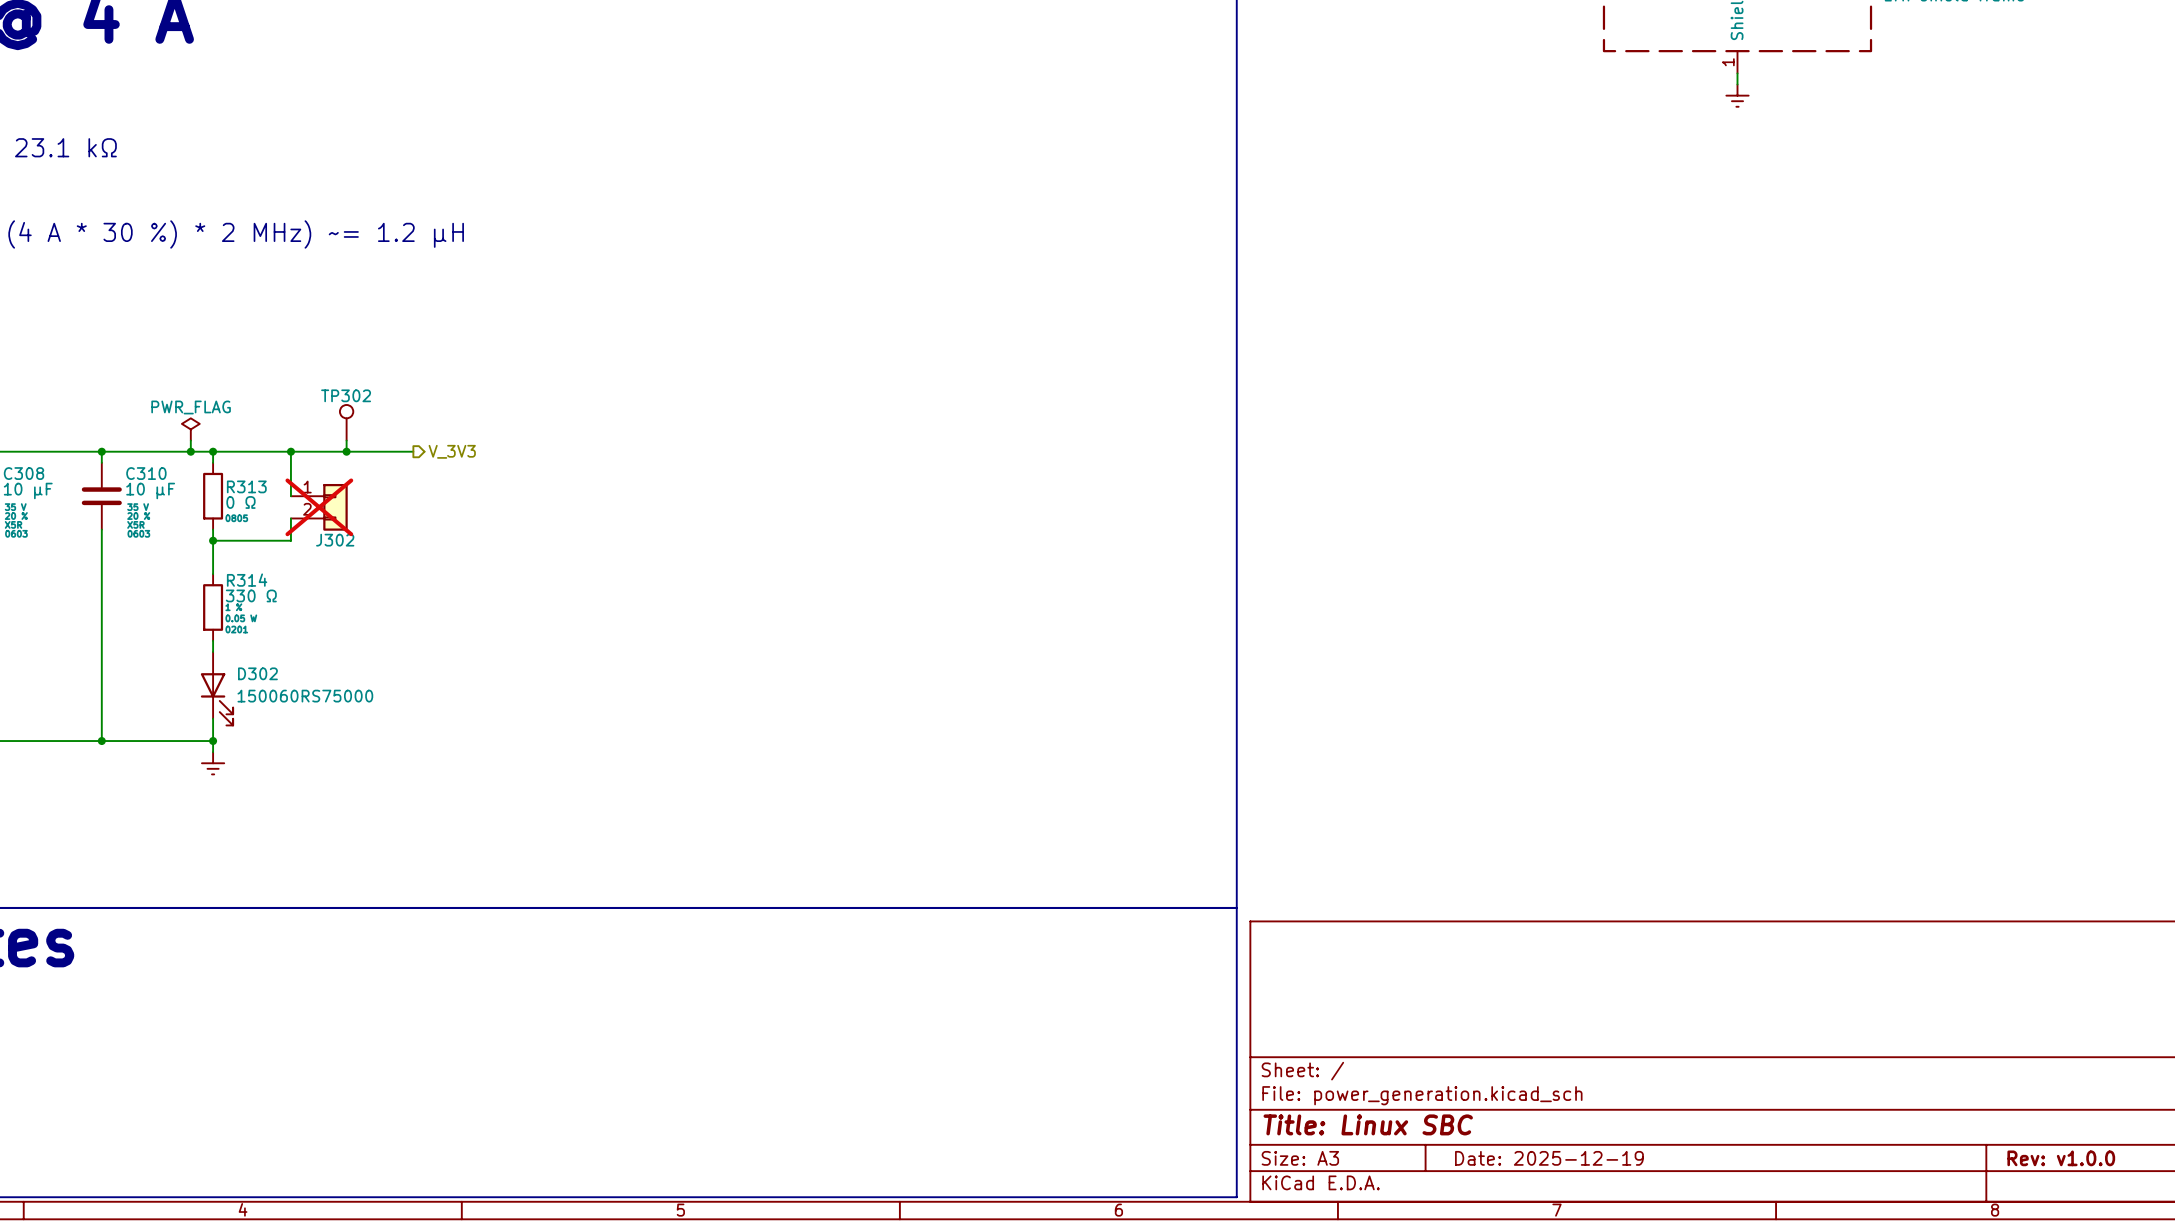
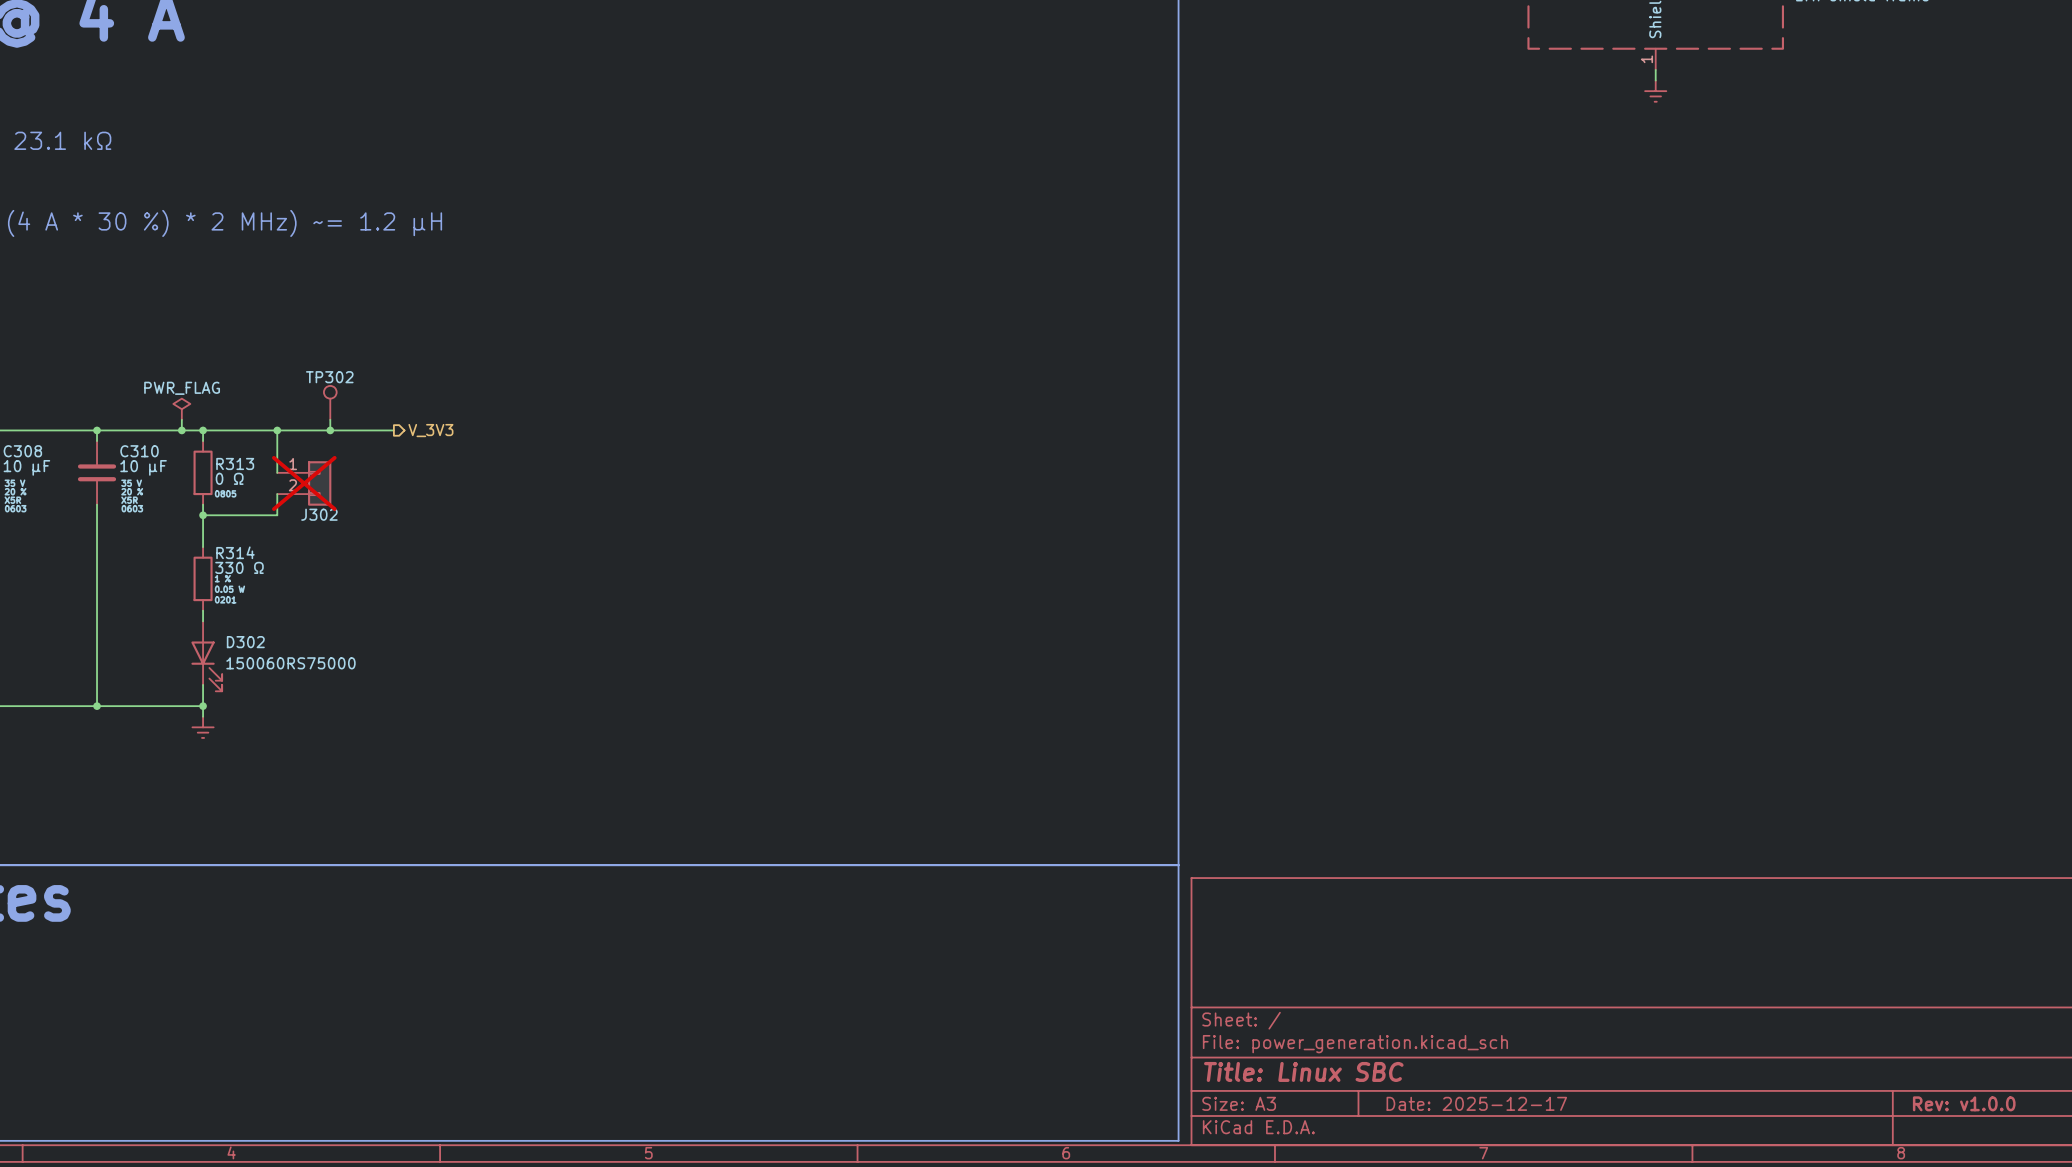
title block: Date: 2025-12-19 (1549, 1158) -> Date: 2025-12-17 (1476, 1103)

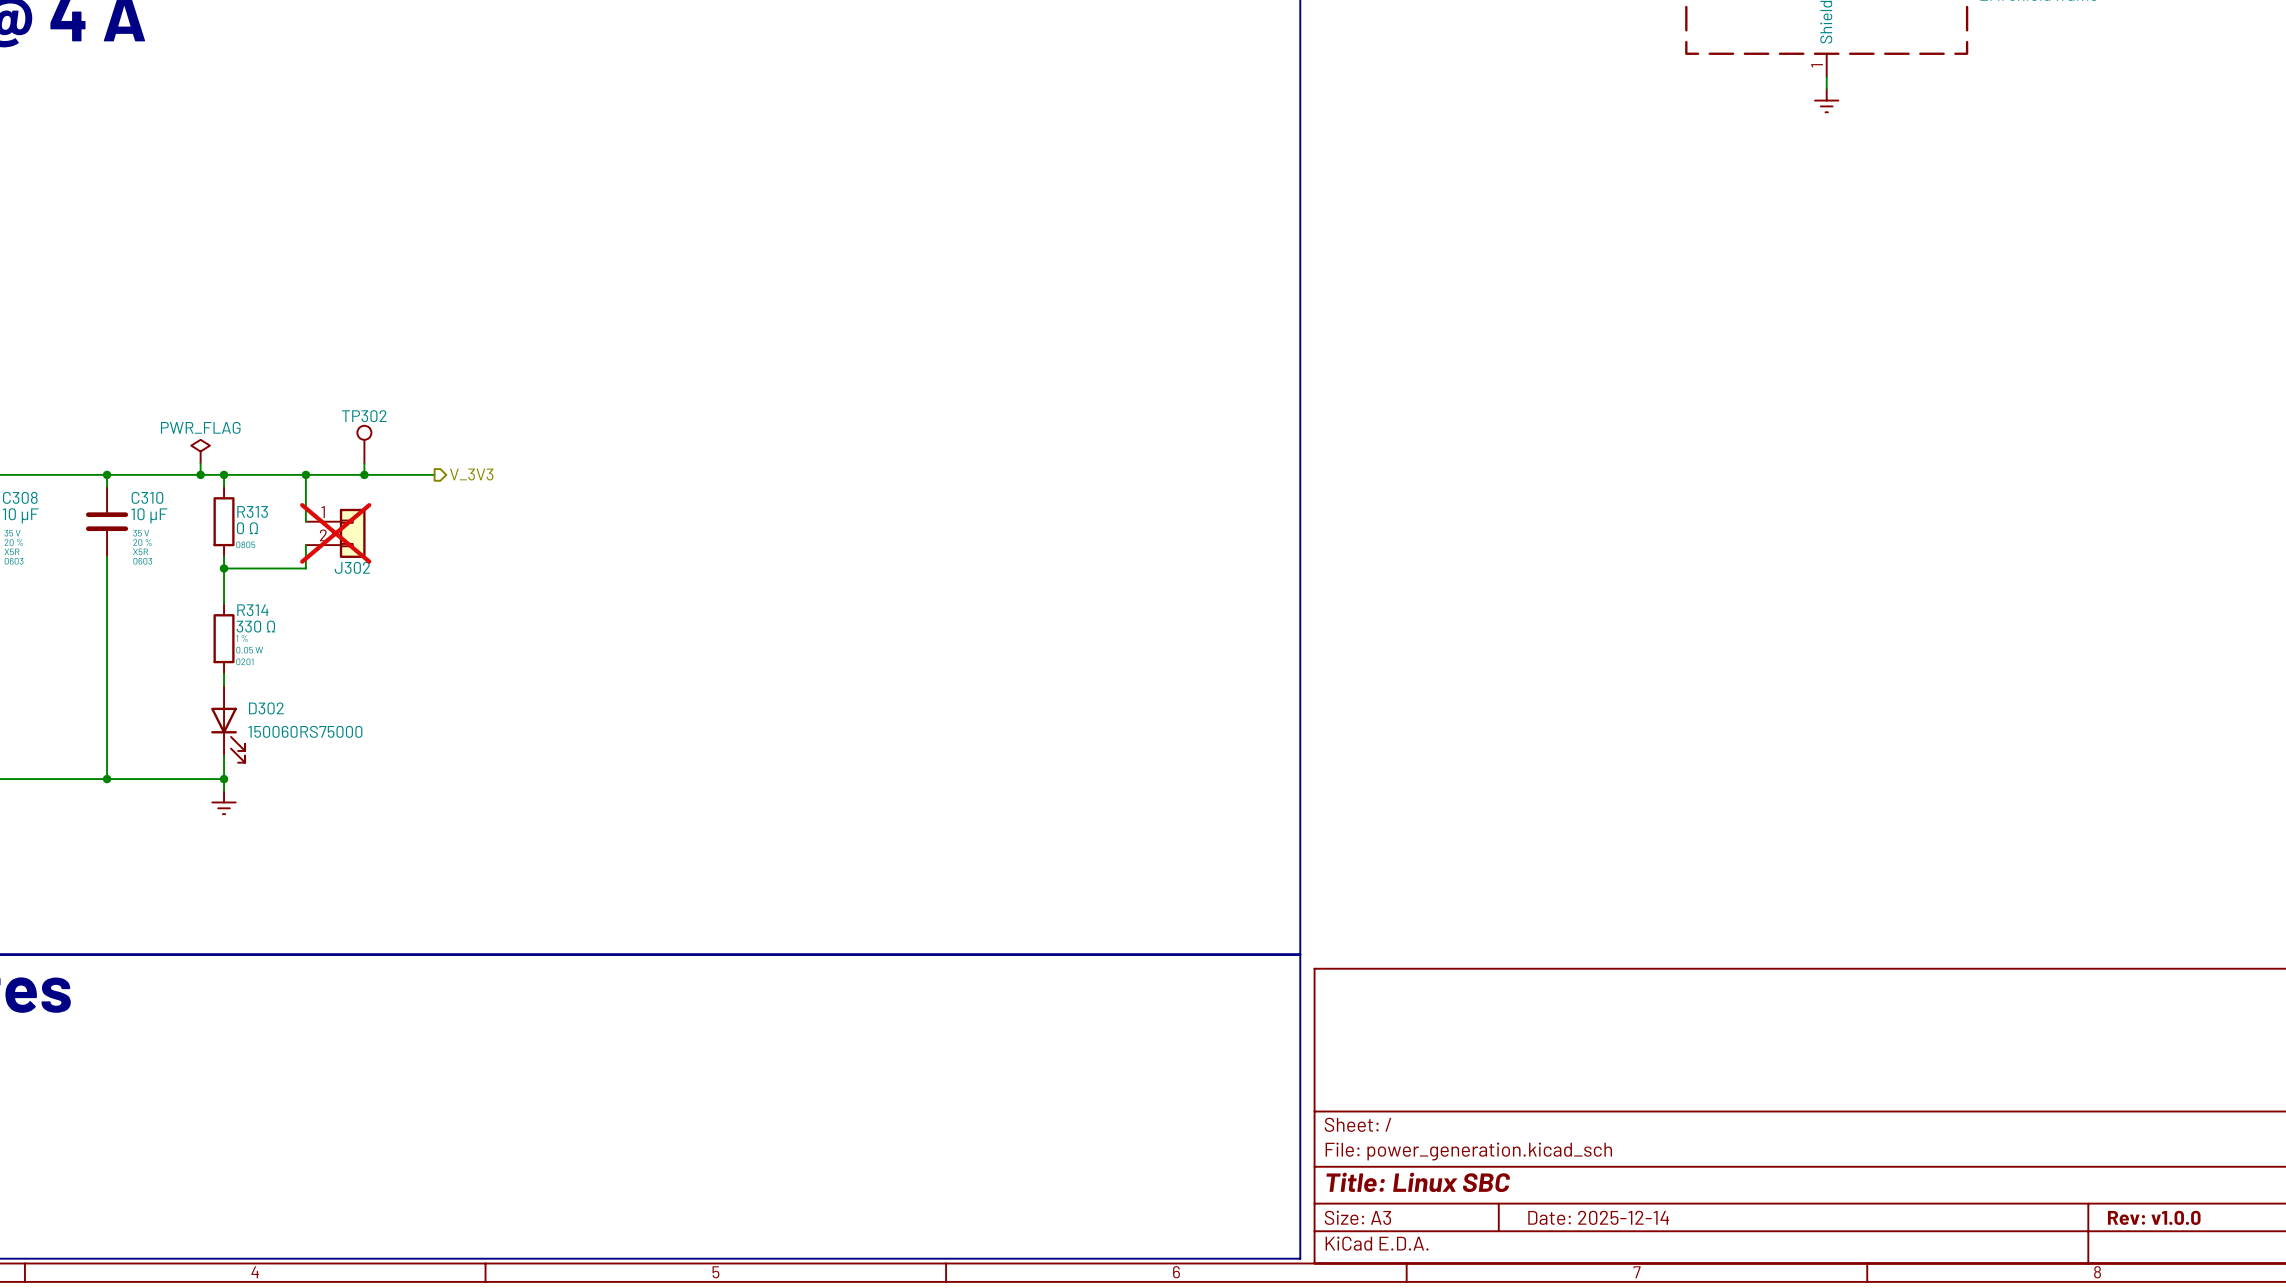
title block: Date: 2025-12-17 (1476, 1103) -> Date: 2025-12-14 (1598, 1217)

